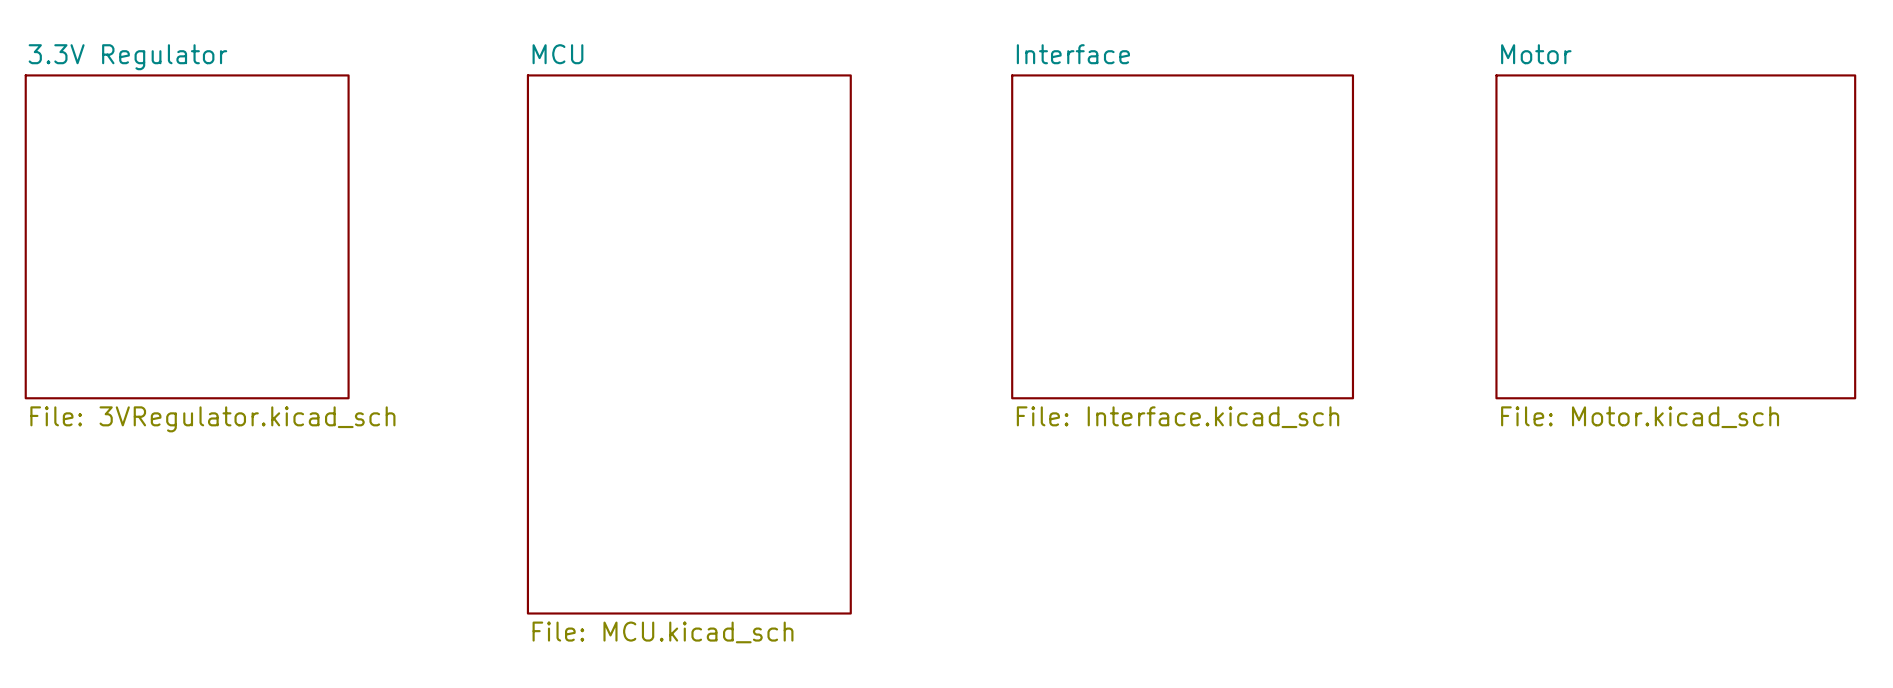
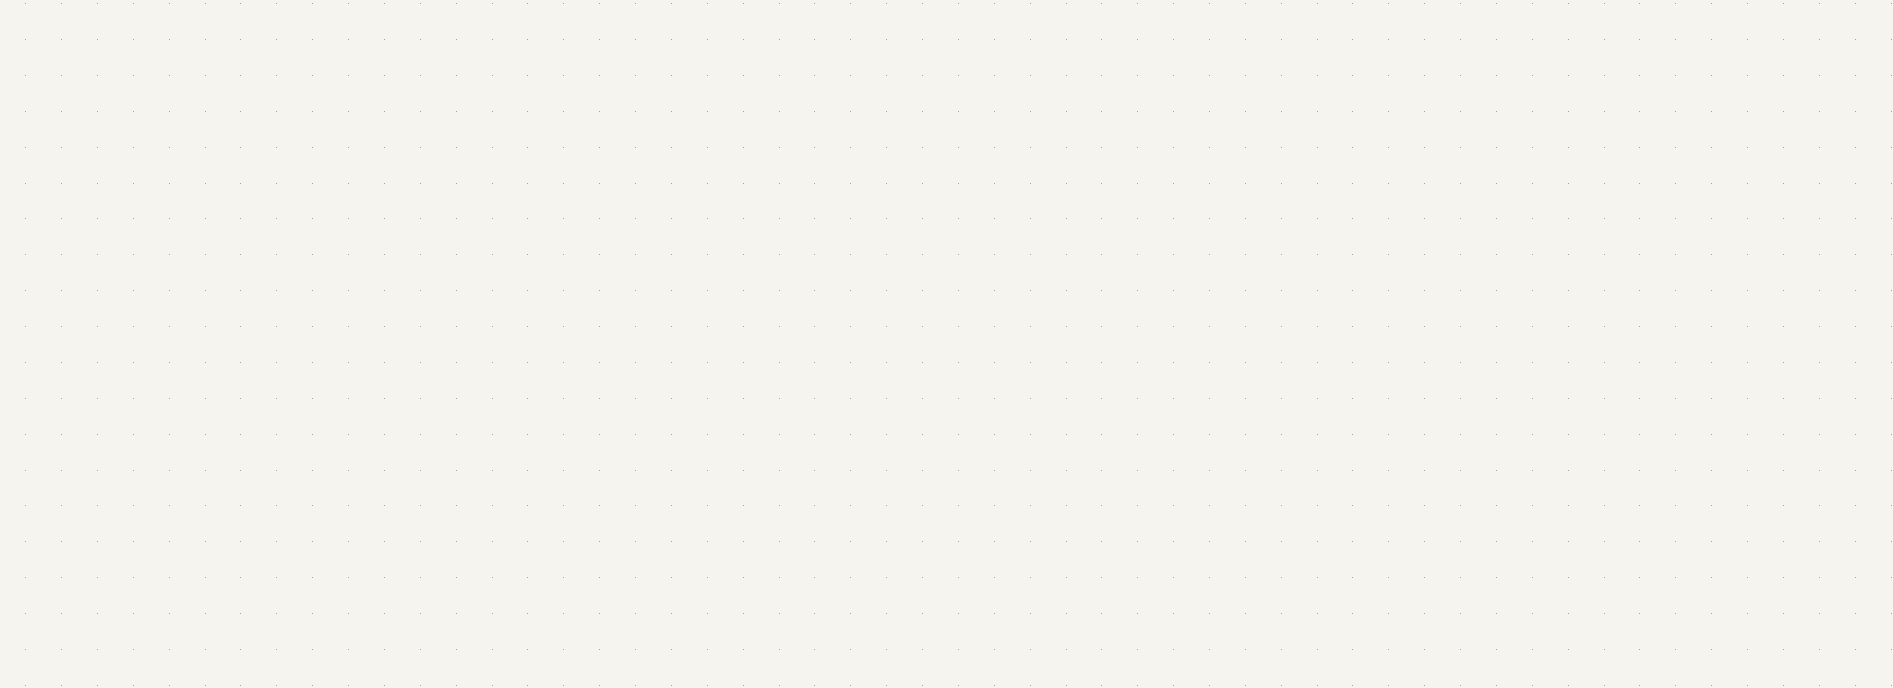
sheet 3.3V Regulator: File: 3VRegulator.kicad_sch (187, 236) -> none
sheet Interface: File: Interface.kicad_sch (1182, 236) -> none
sheet Motor: File: Motor.kicad_sch (1675, 236) -> none
sheet MCU: File: MCU.kicad_sch (689, 344) -> none

